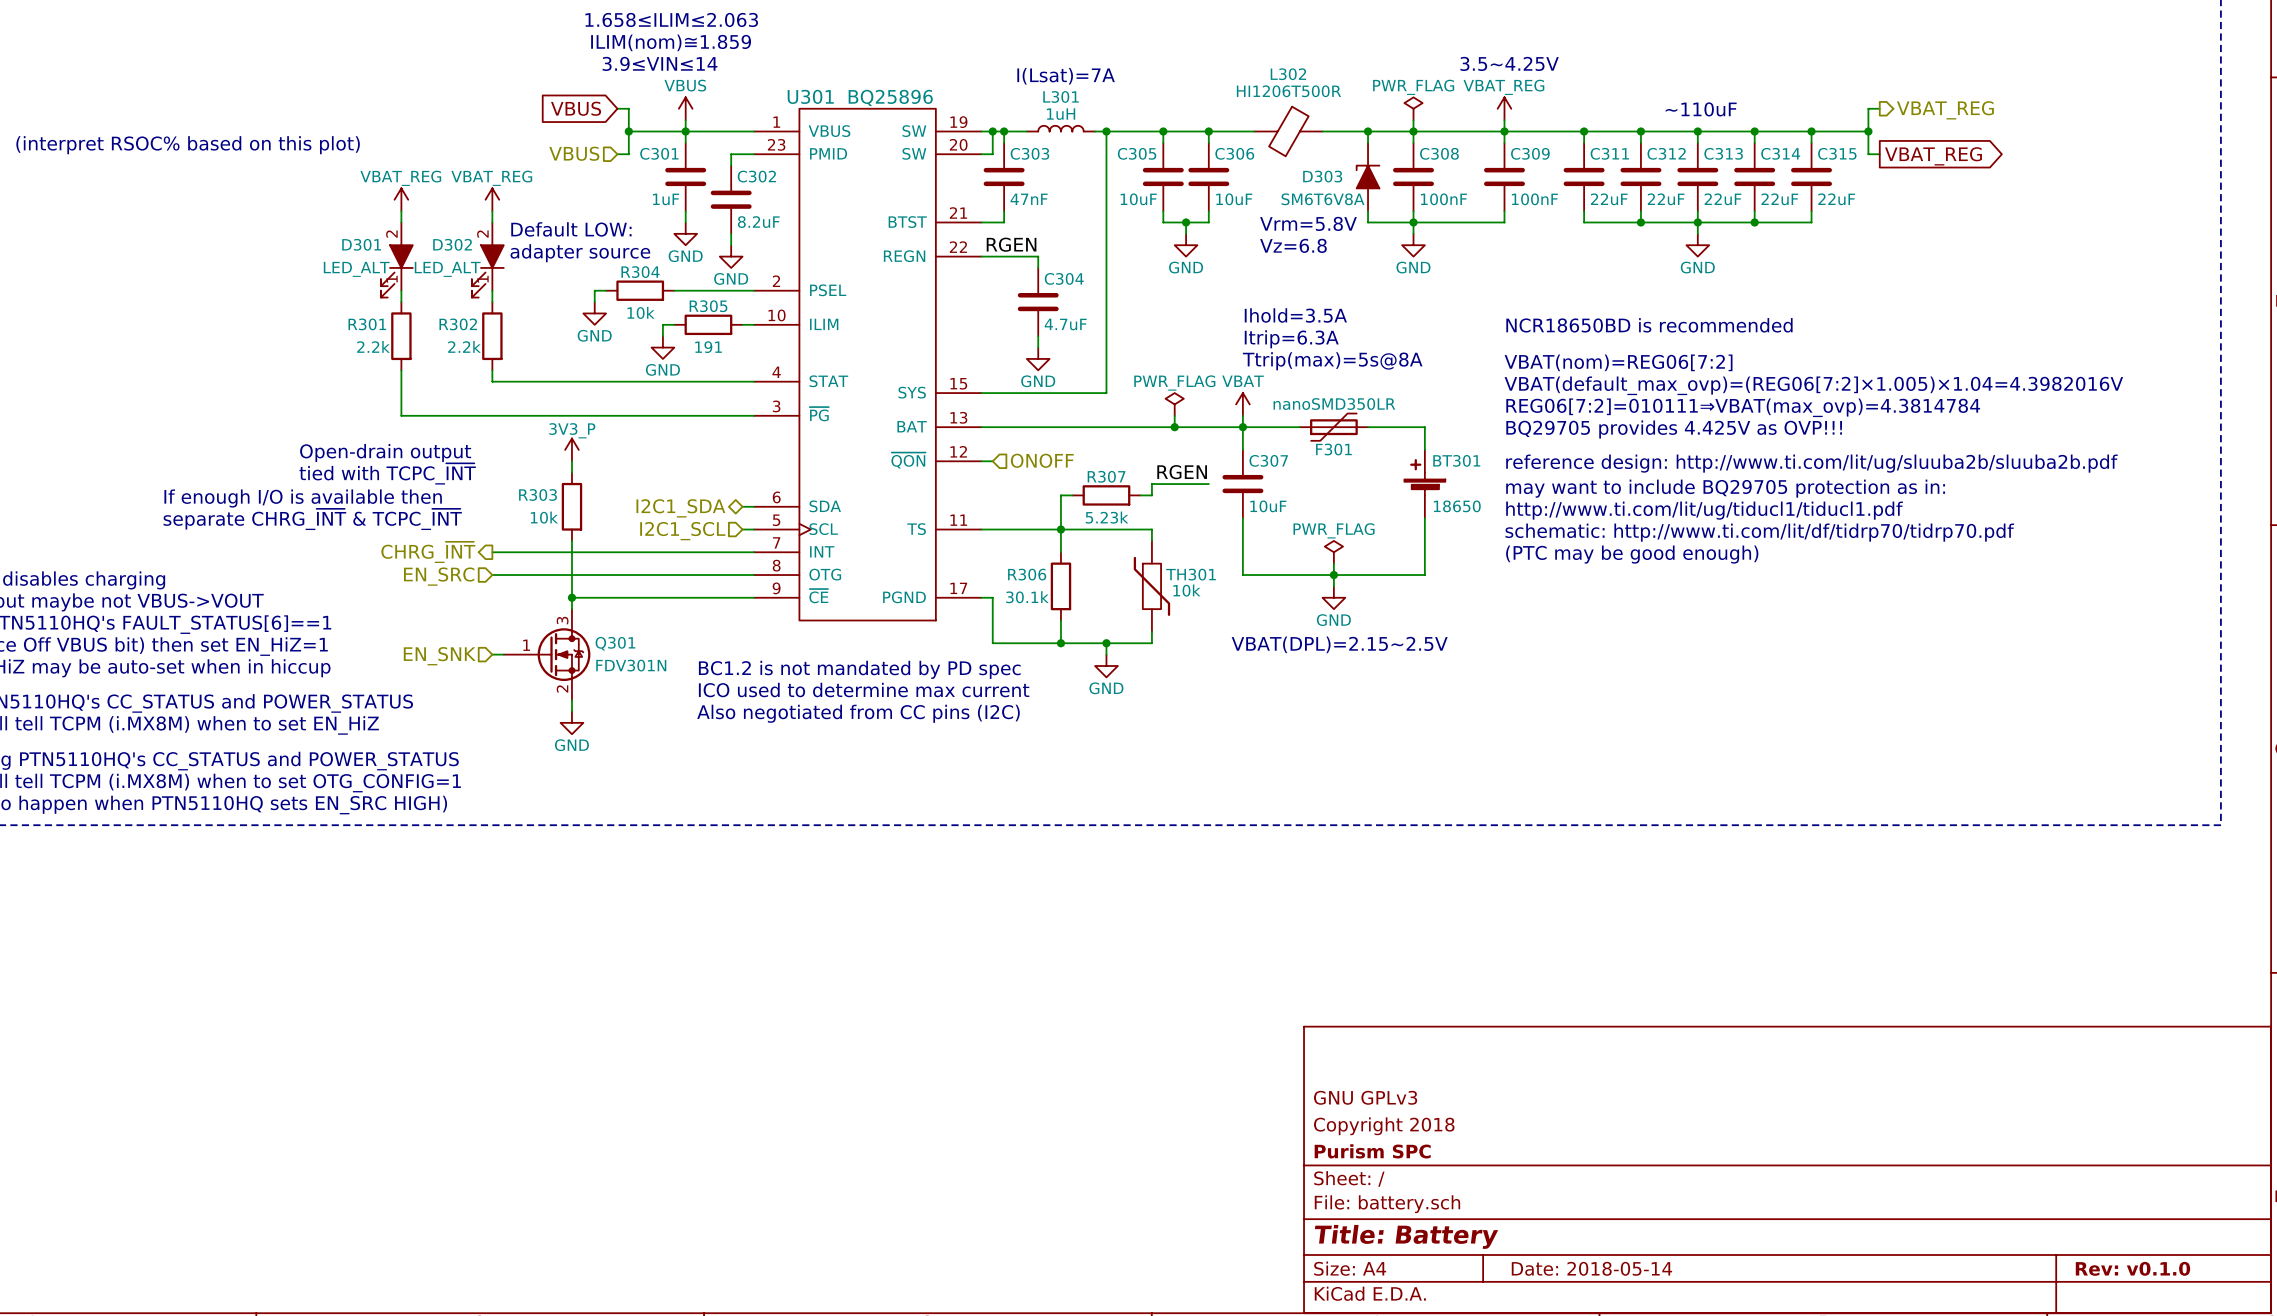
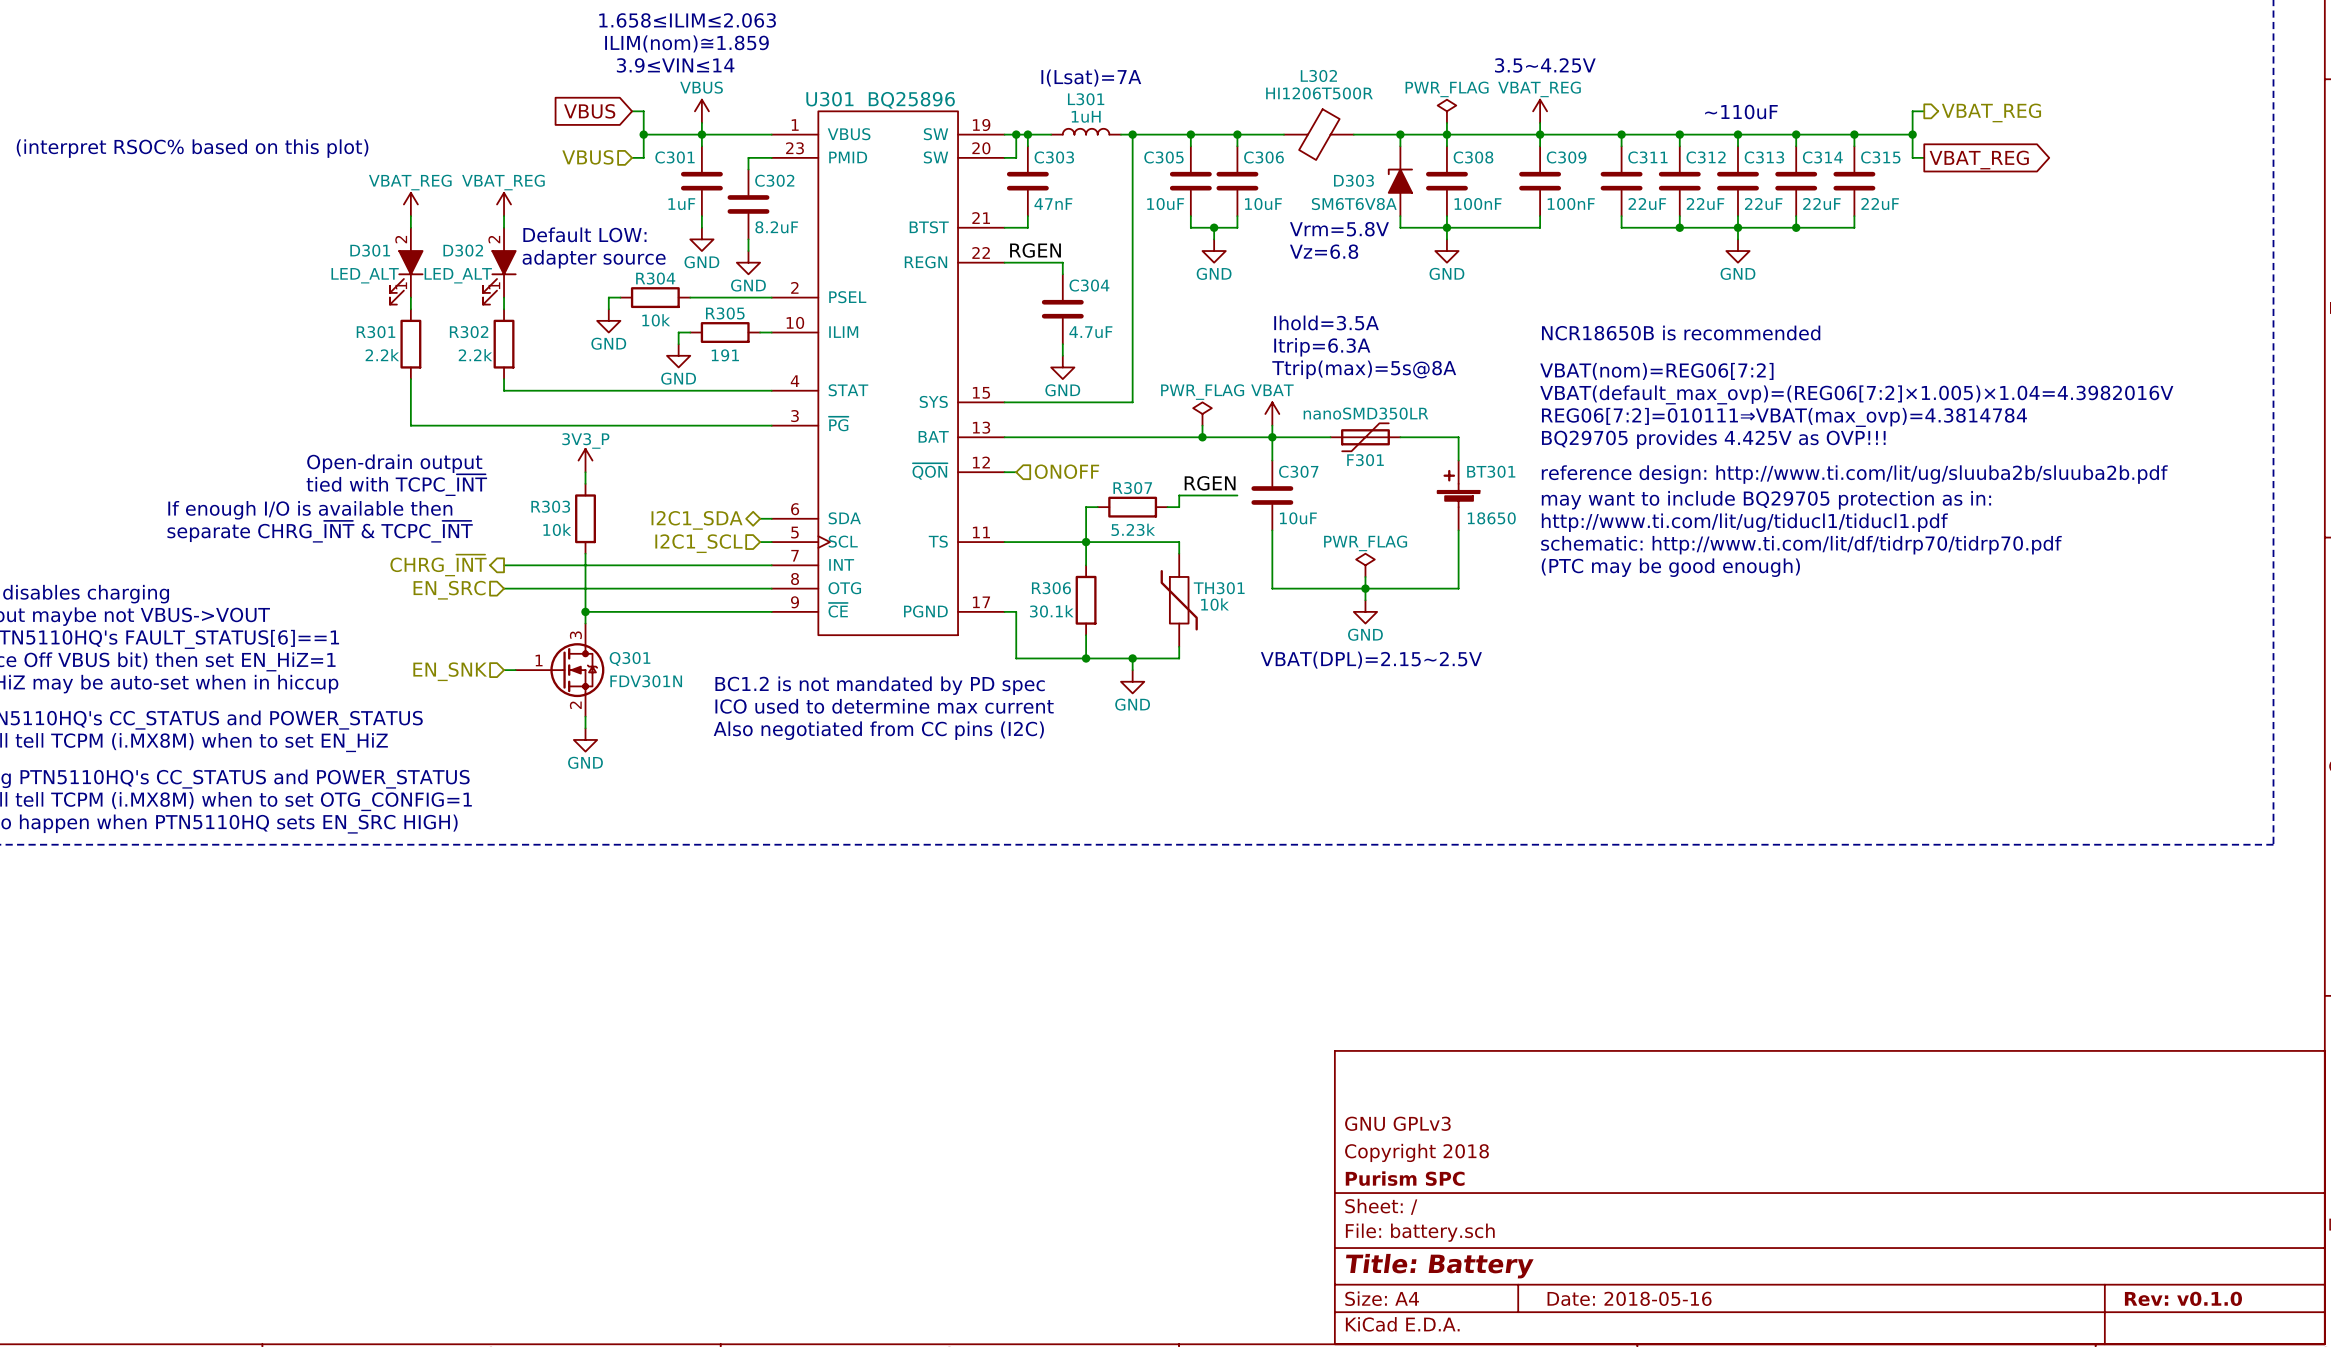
text: NCR18650BD is recommended (1649, 325) -> NCR18650B is recommended (1681, 333)
title block: Date: 2018-05-14 (1591, 1268) -> Date: 2018-05-16 (1629, 1298)

